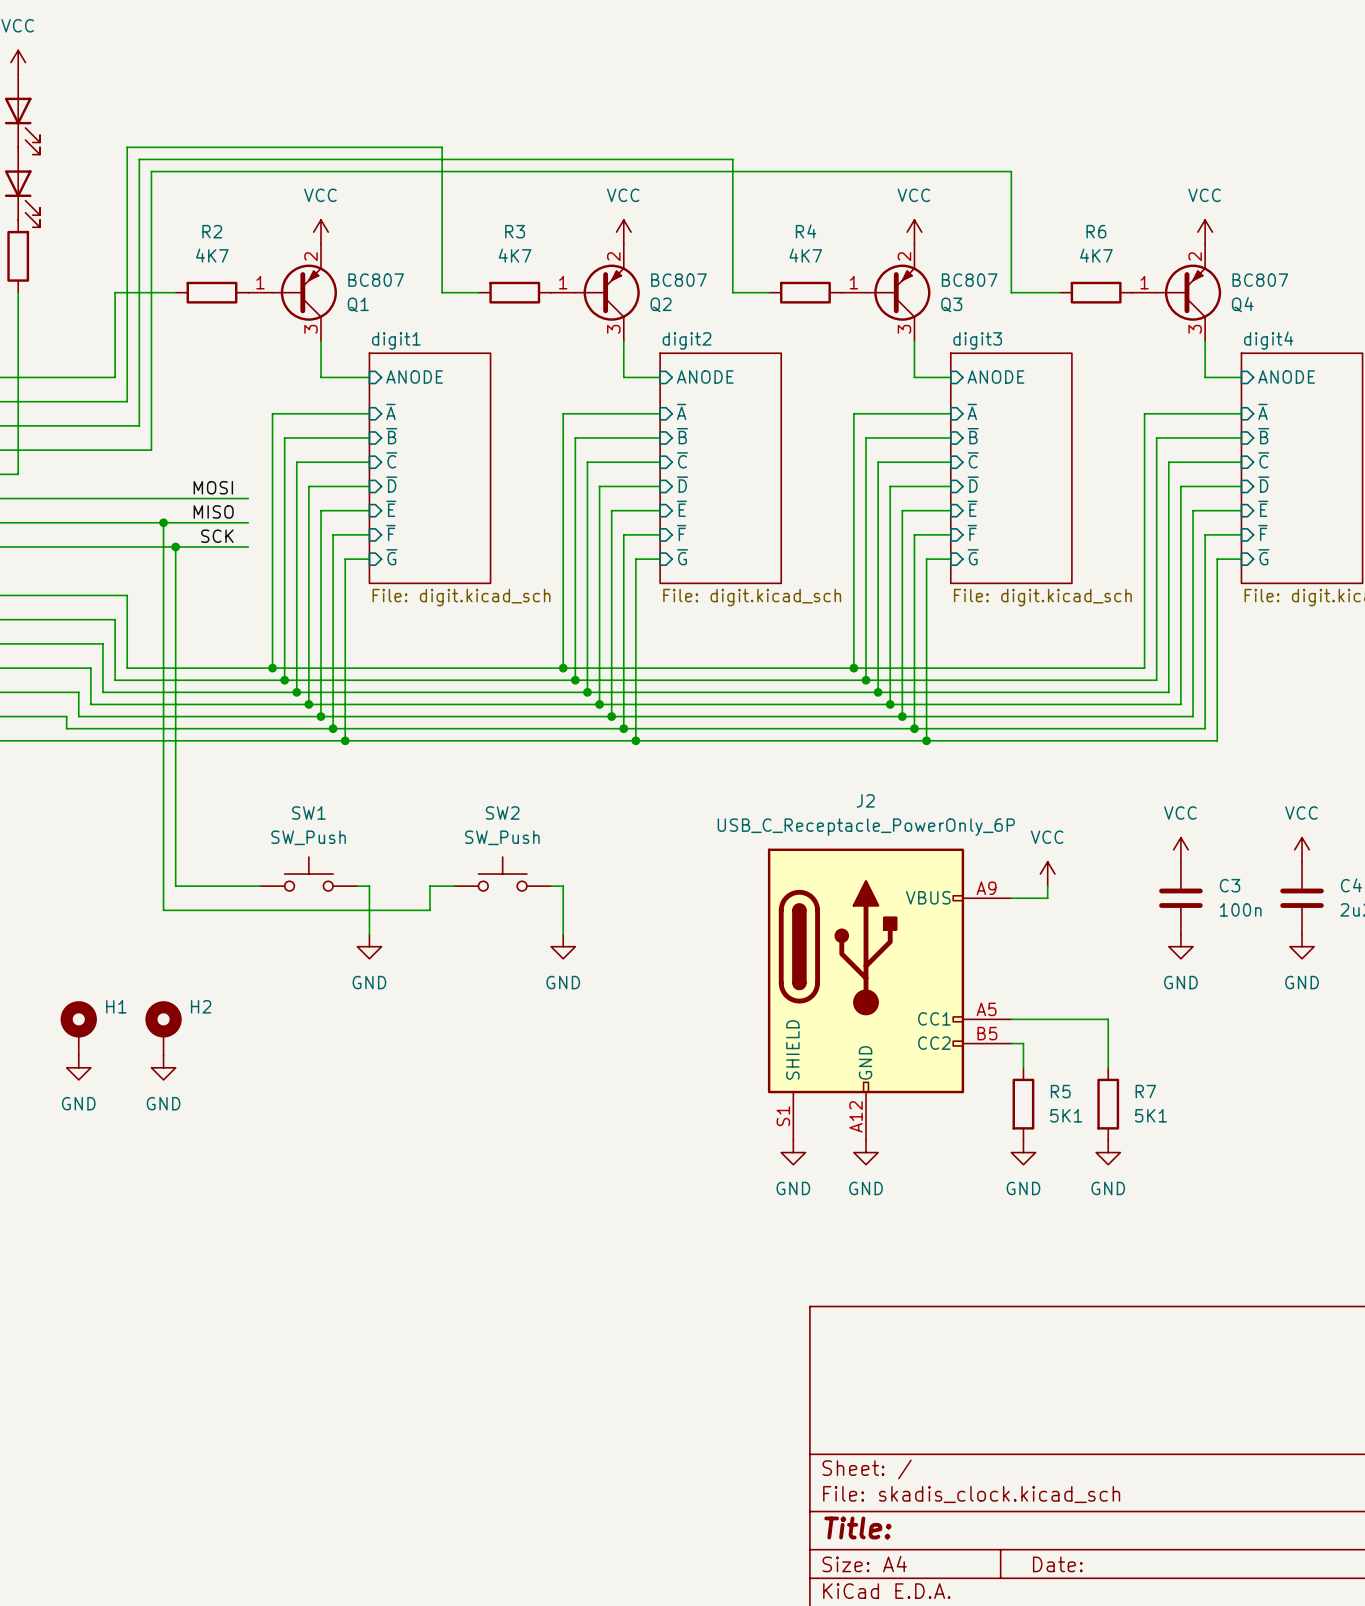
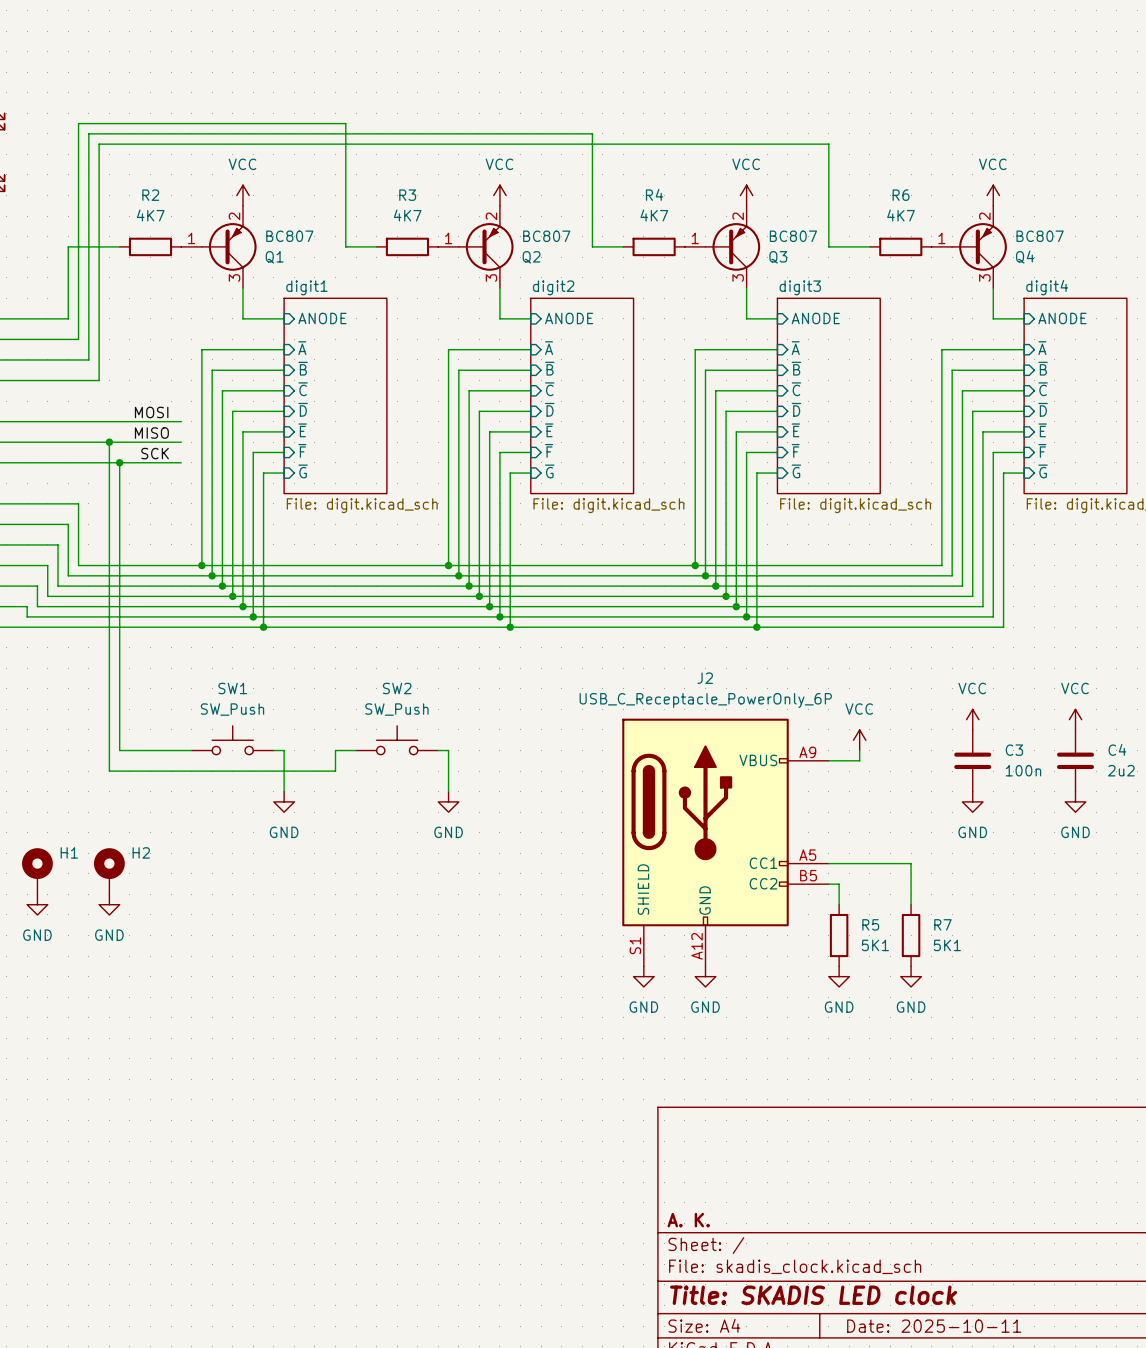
title block: none -> A. K. (688, 1220)
title block: Title: (857, 1527) -> Title: SKADIS LED clock (813, 1295)
title block: Date: (1057, 1564) -> Date: 2025-10-11 (934, 1326)

